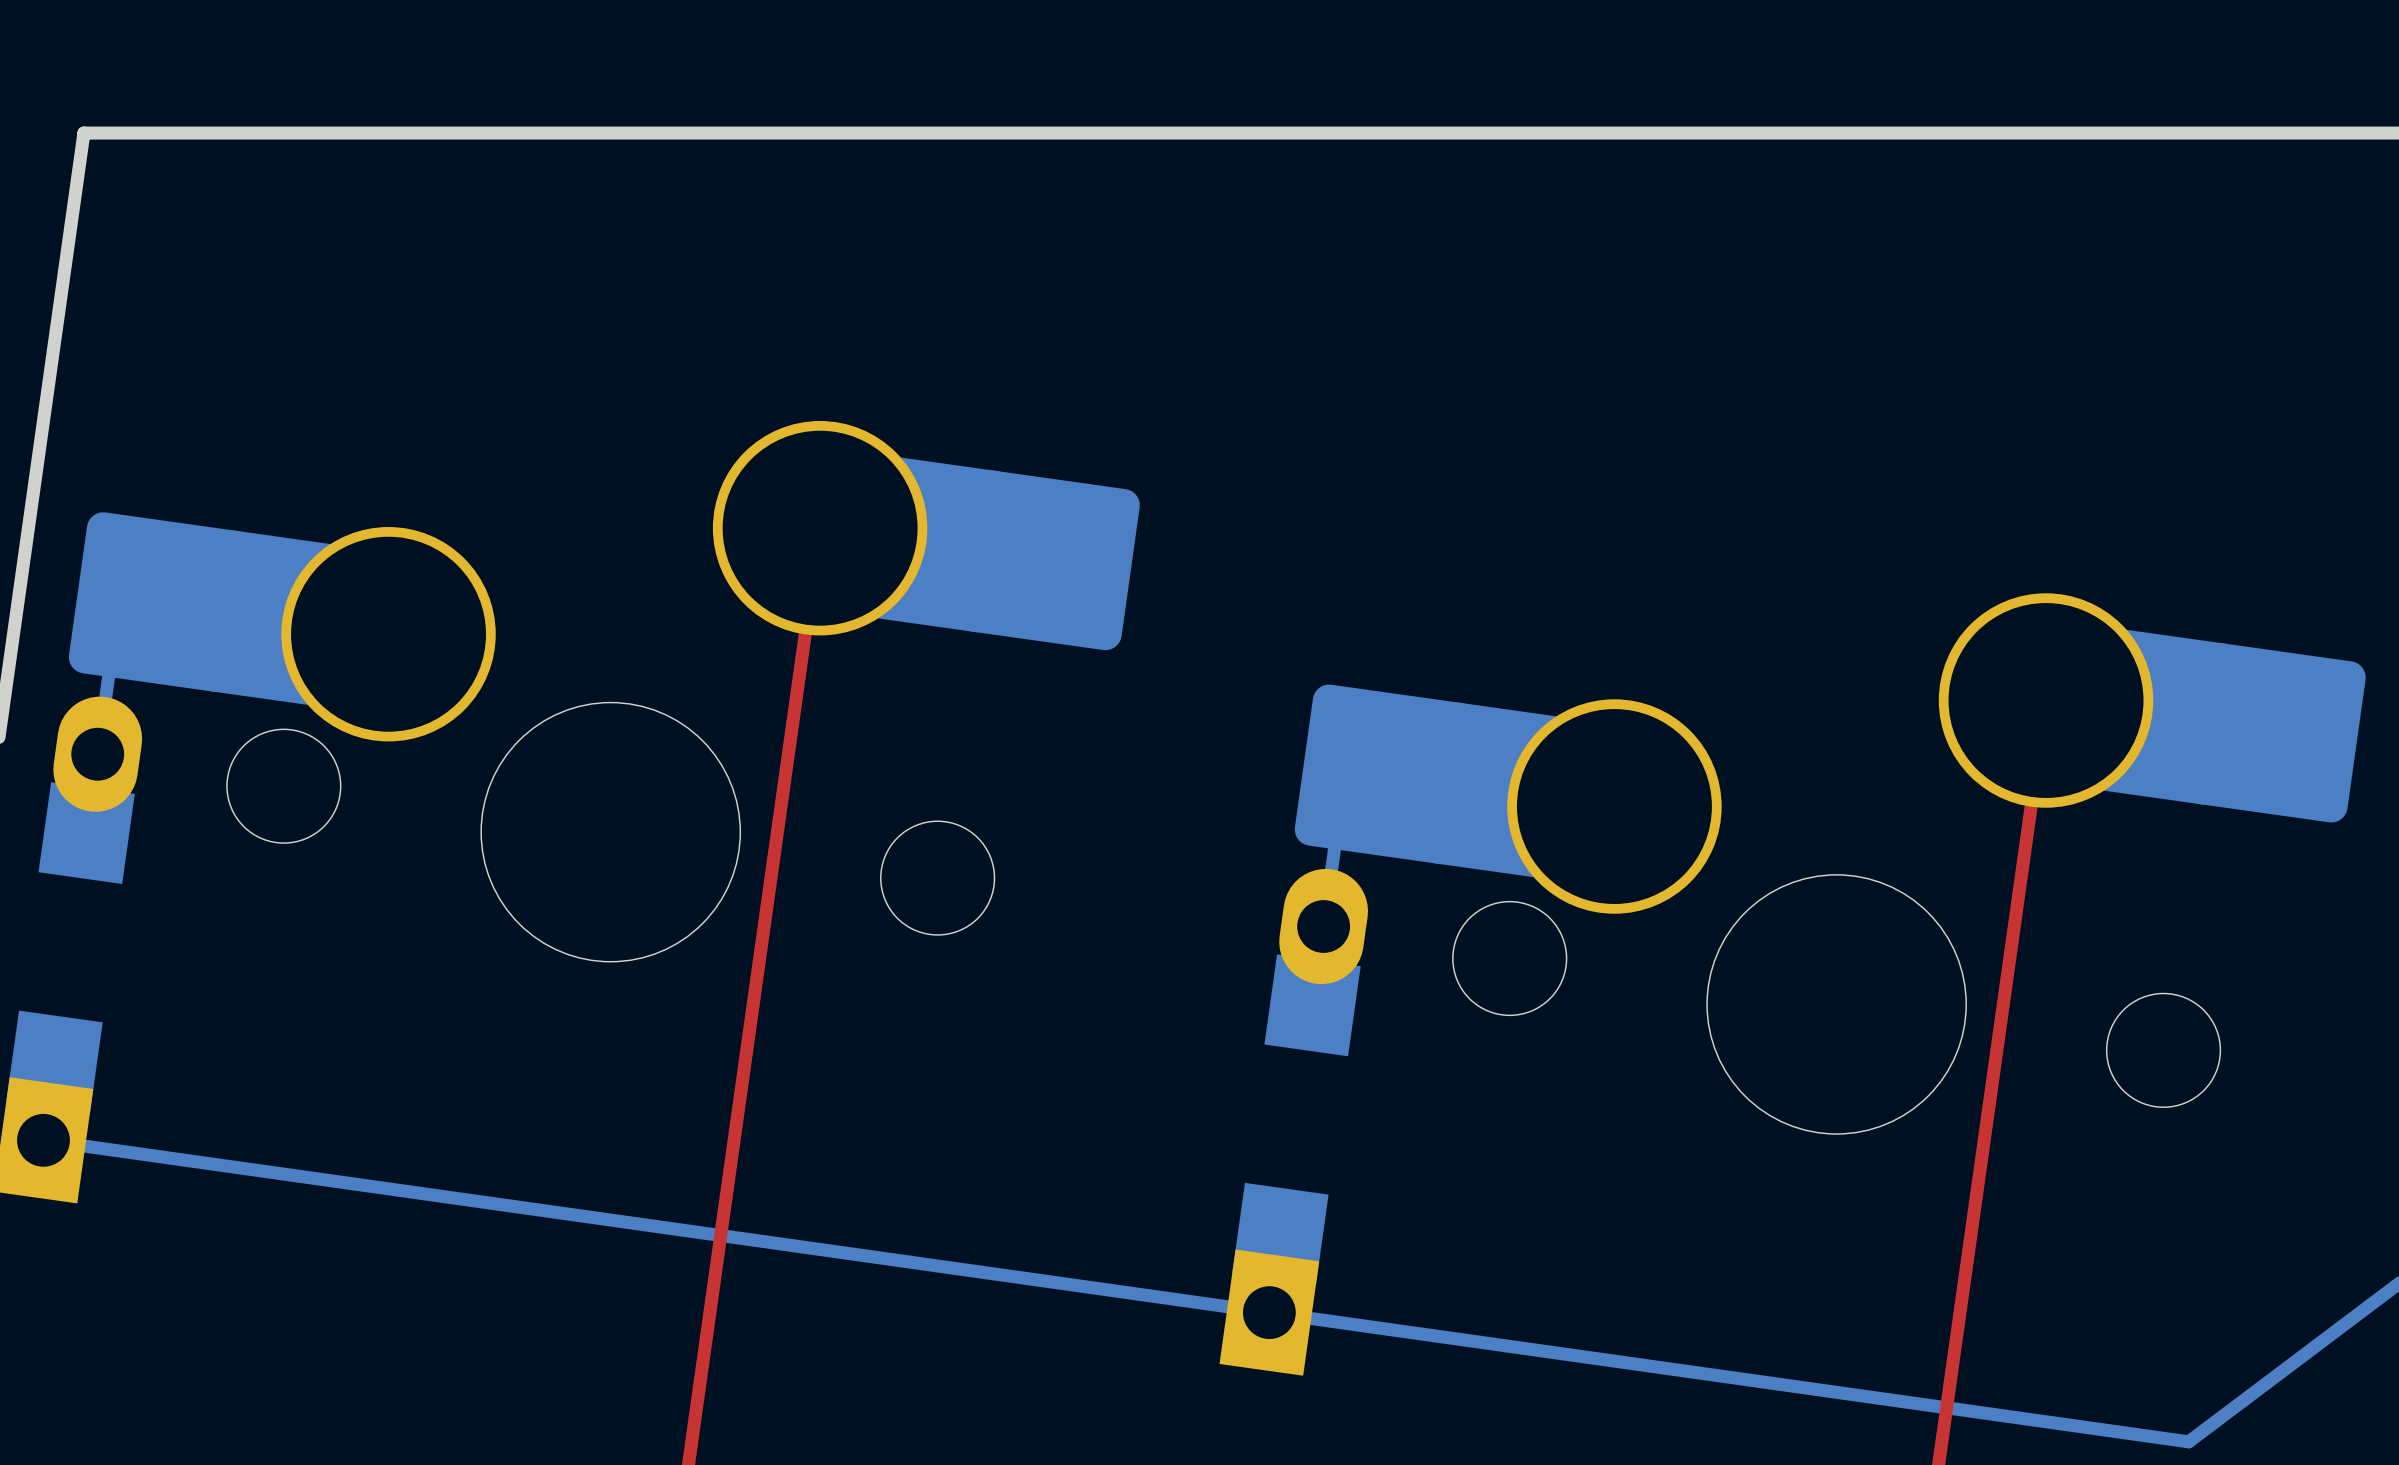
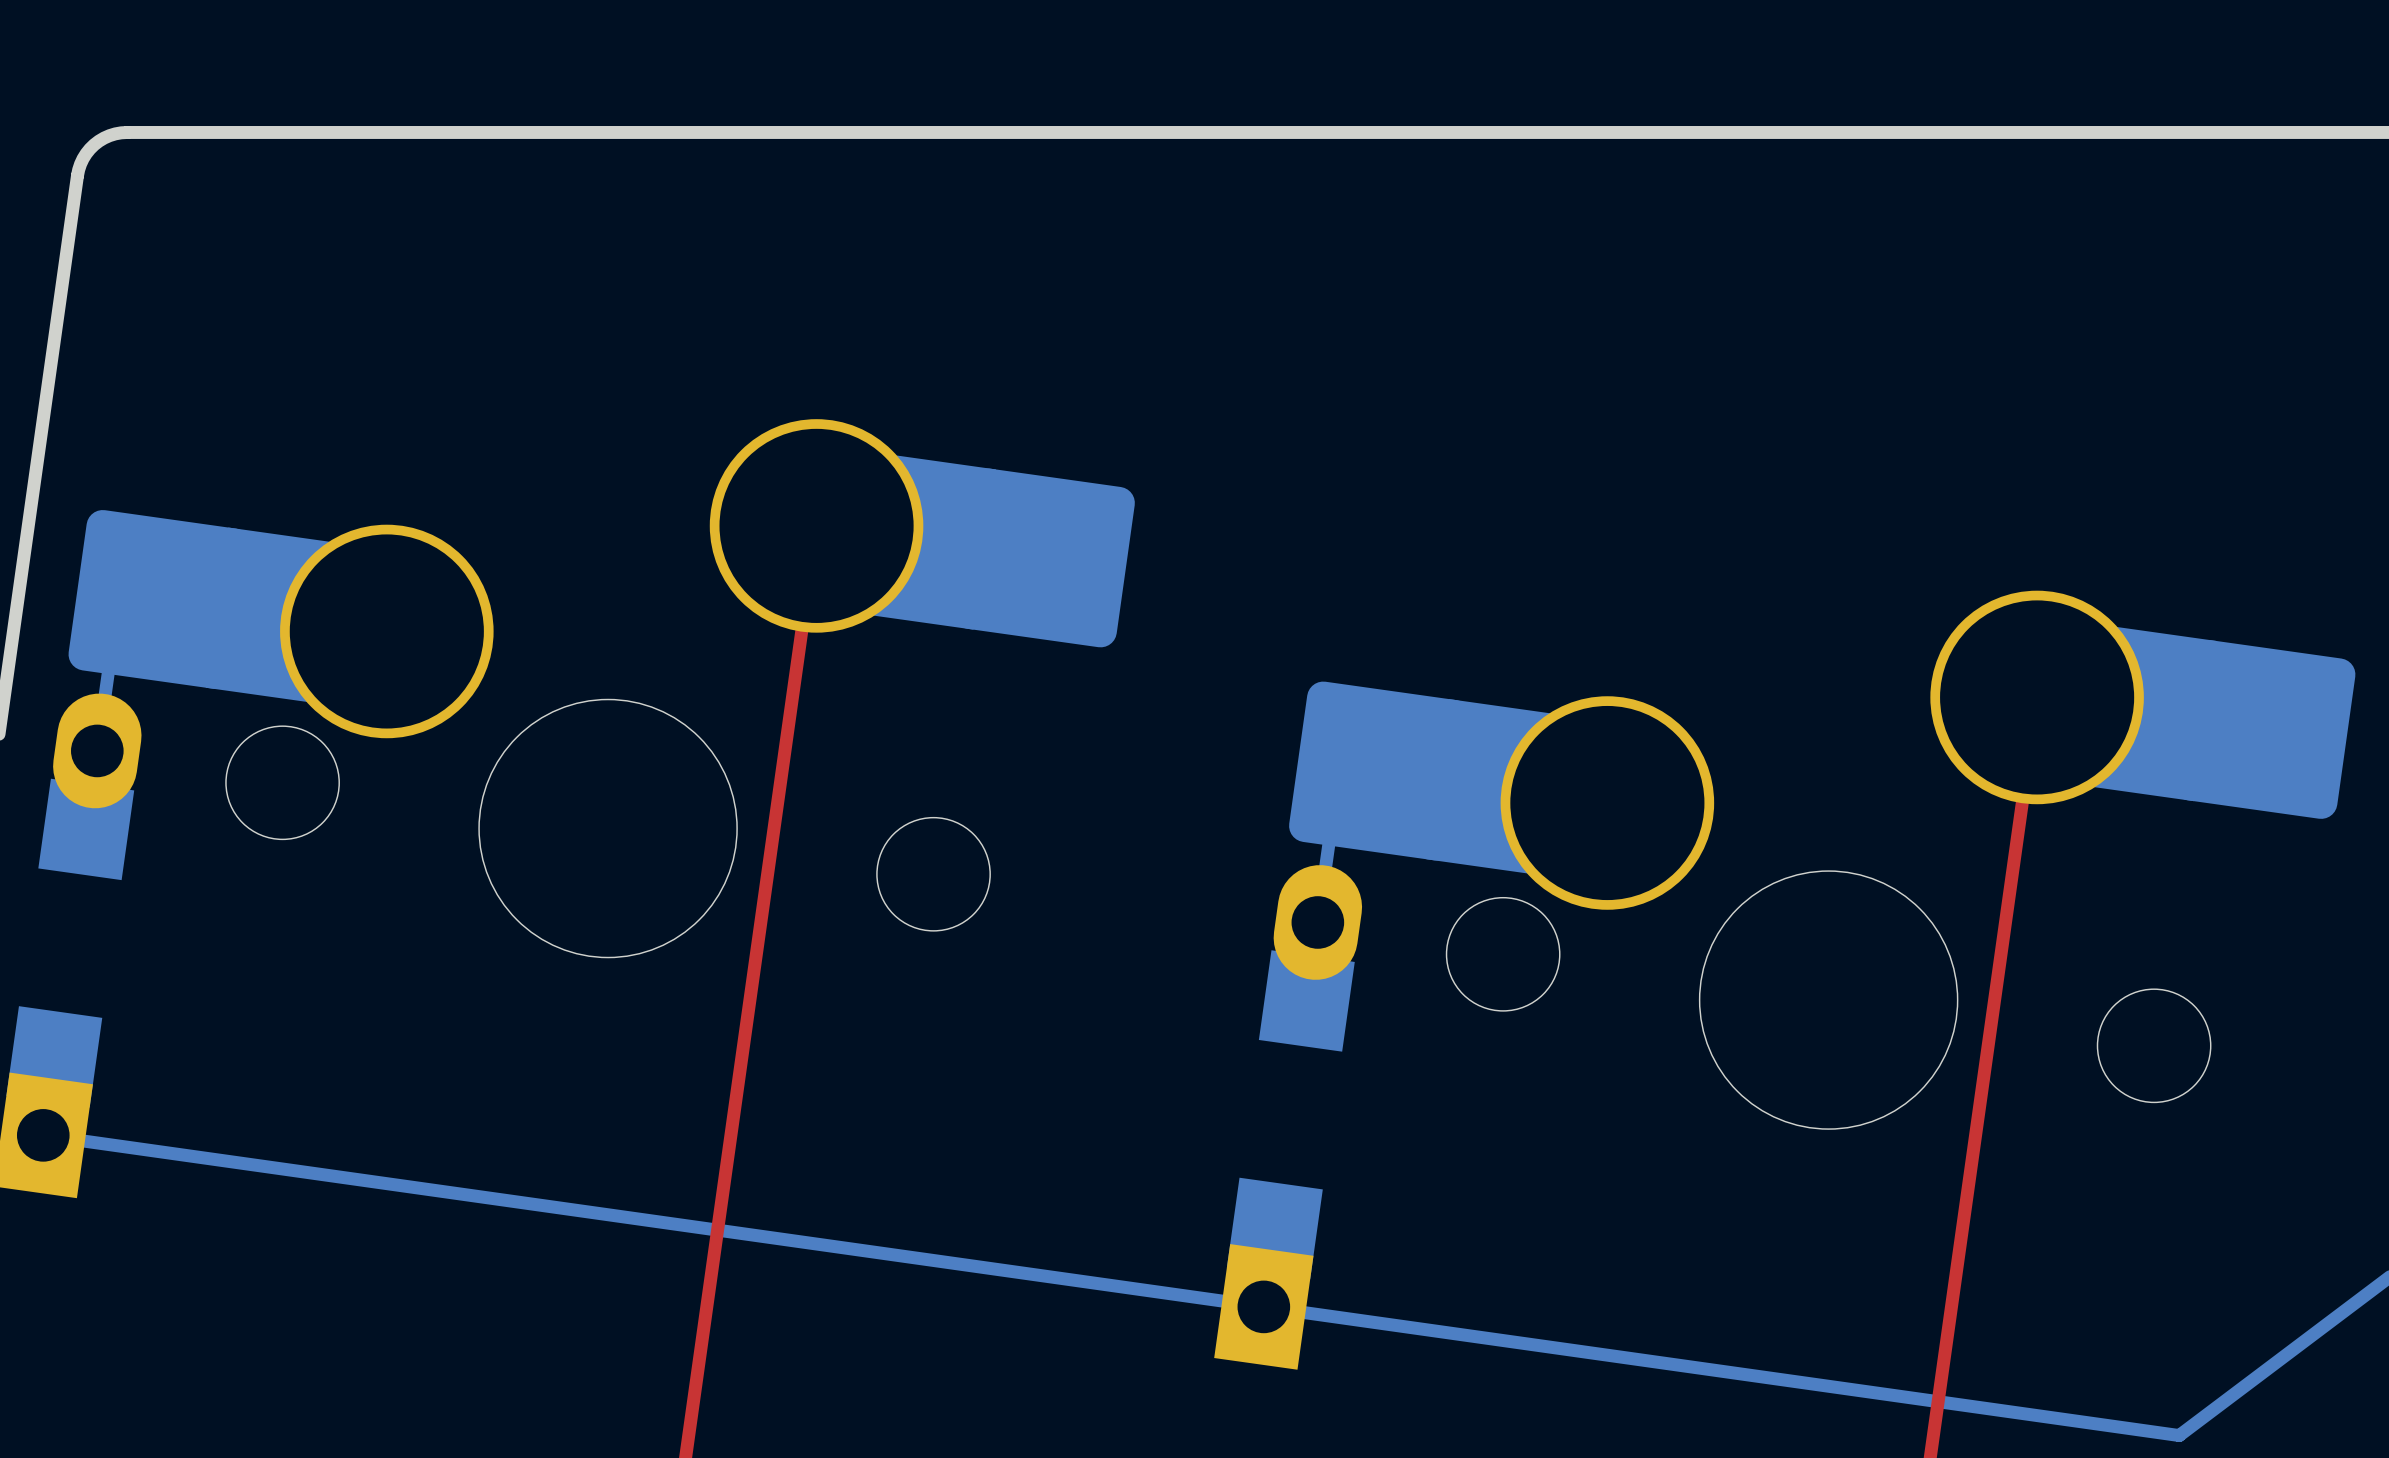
board edge: (127, 133) (83, 133) (77, 176) -> (127, 132) (109, 135) (94, 144) (83, 158) (77, 175)

